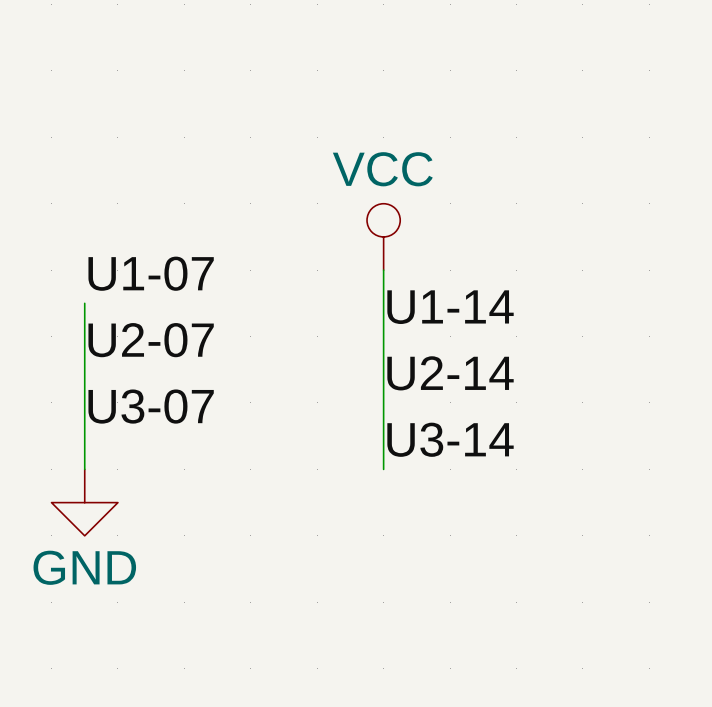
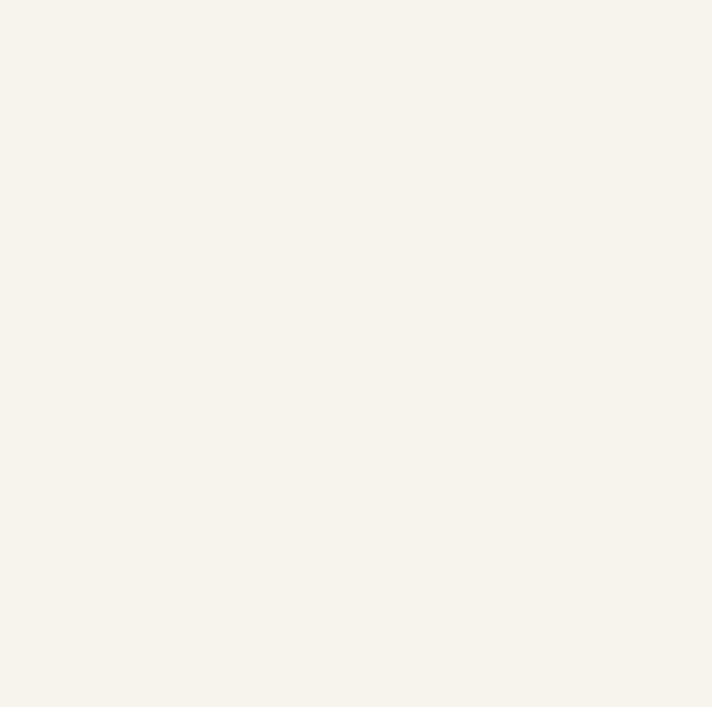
power symbol: VCC (383, 236) -> none
wire: (383, 270) (383, 469) -> none
label: U1-07 (151, 273) -> none
wire: (84, 303) (84, 469) -> none
label: U1-14 (450, 307) -> none
label: U2-07 (151, 340) -> none
label: U2-14 (450, 373) -> none
label: U3-07 (151, 406) -> none
label: U3-14 (450, 439) -> none
power symbol: GND (84, 502) -> none

